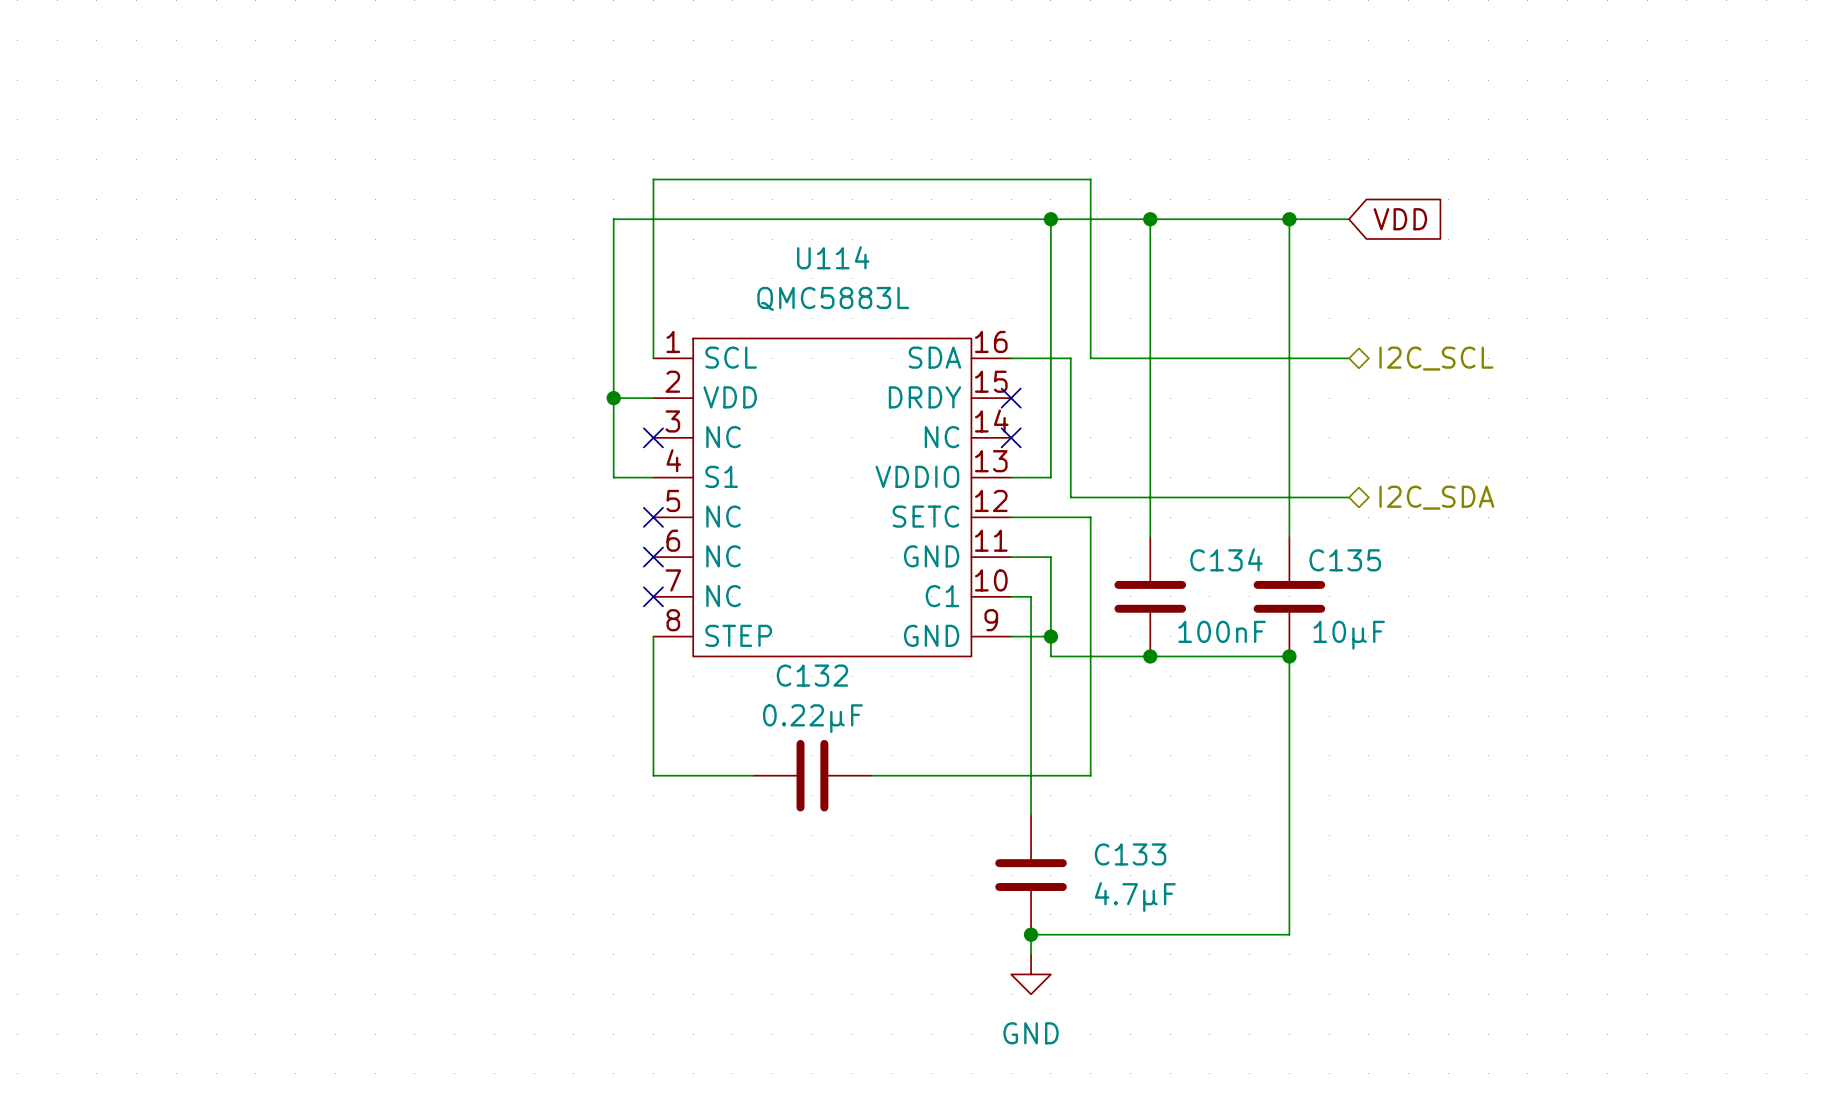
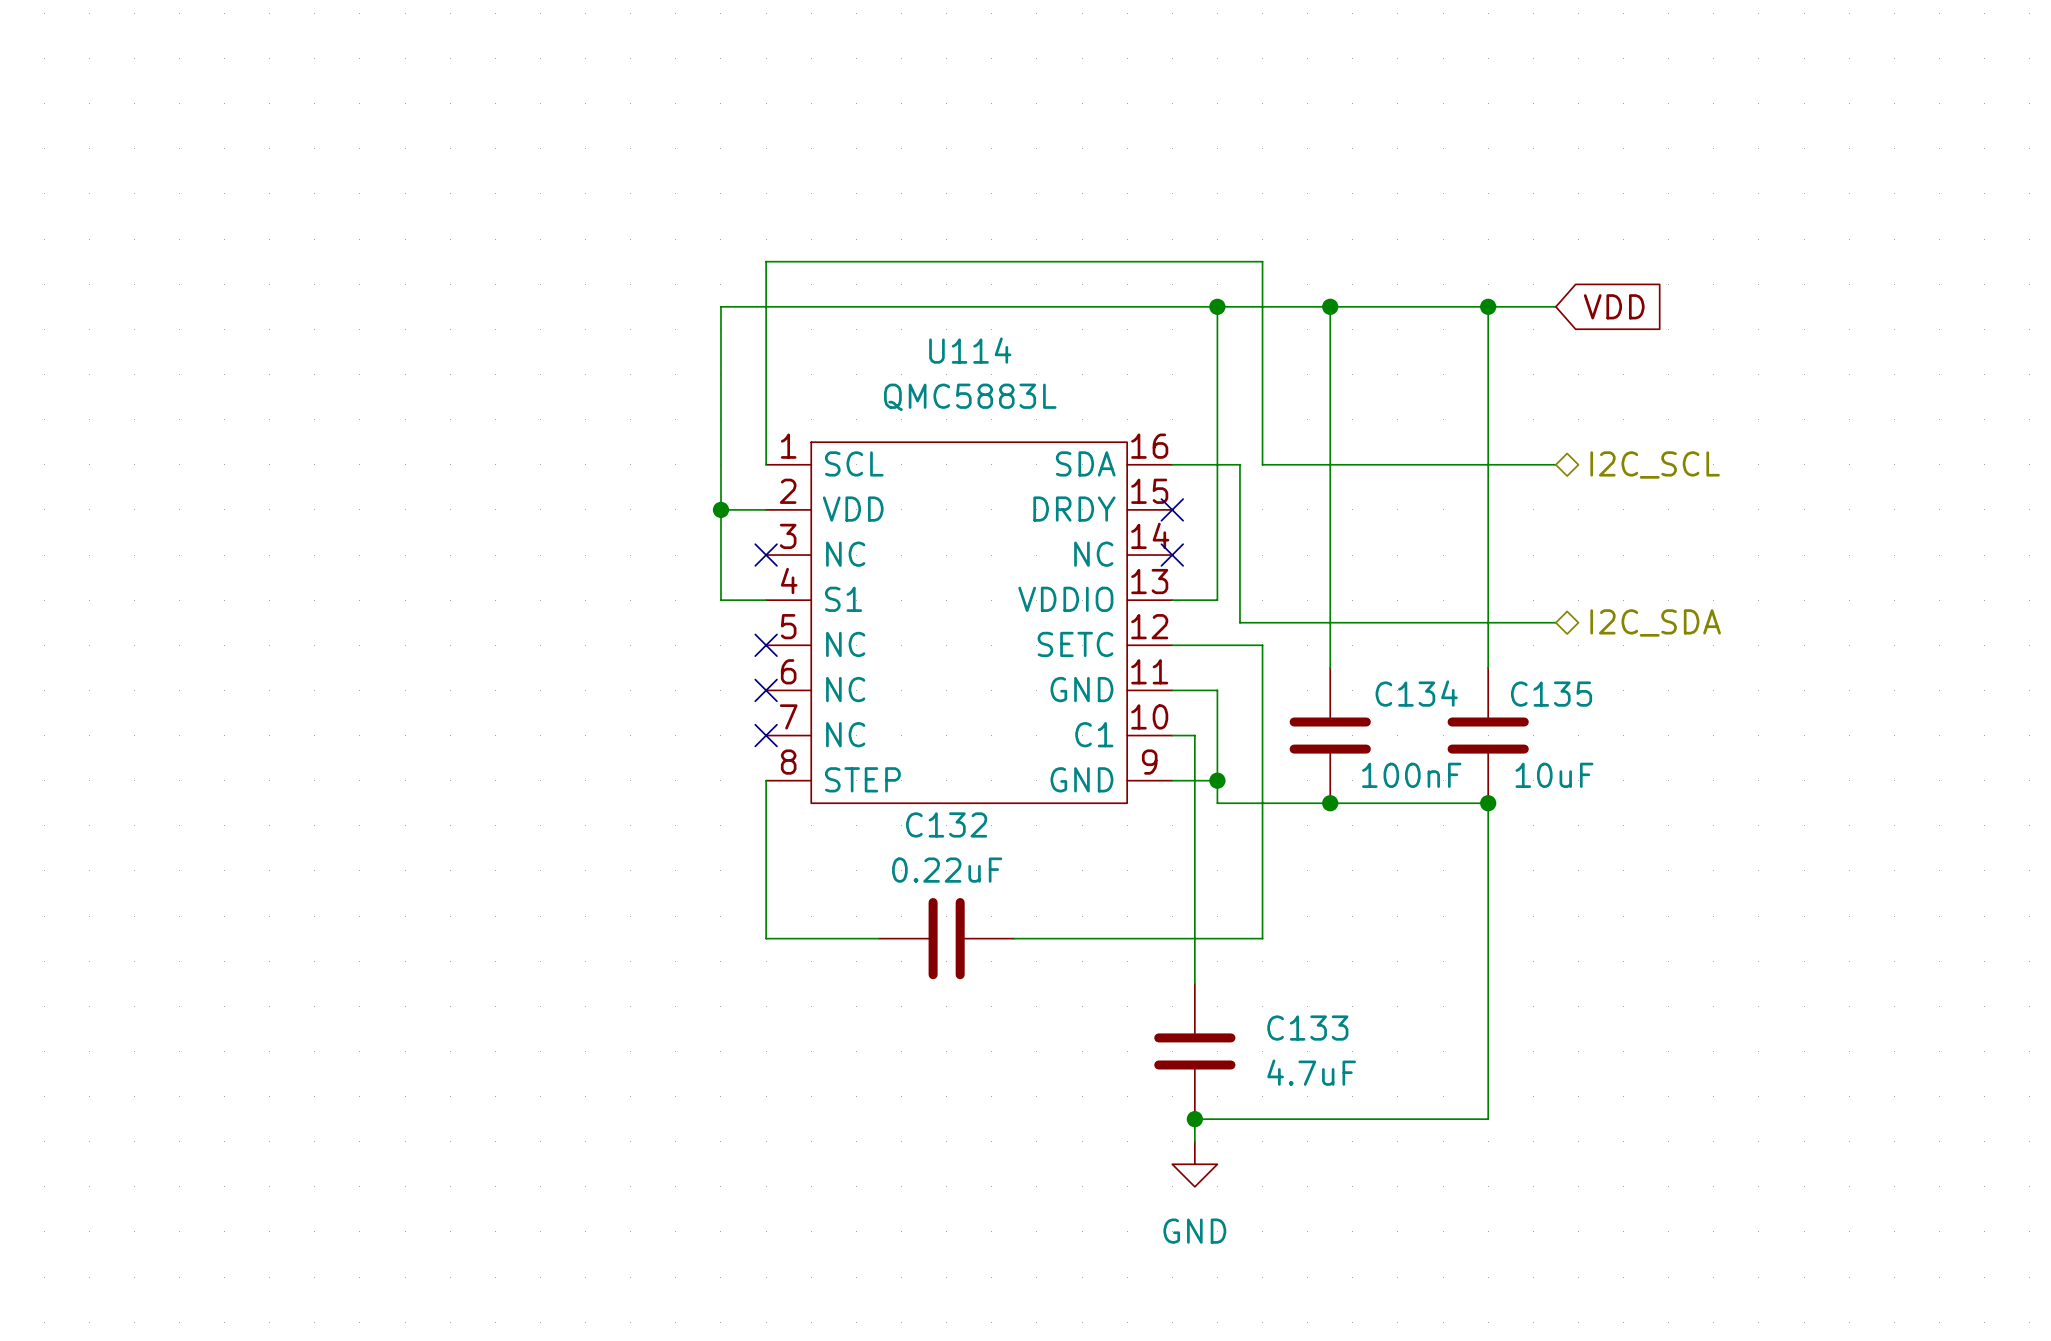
C135 value: 10μF (1349, 635) -> 10uF (1554, 775)
C132 value: 0.22μF (812, 718) -> 0.22uF (947, 870)
C133 value: 4.7μF (1135, 897) -> 4.7uF (1311, 1072)

